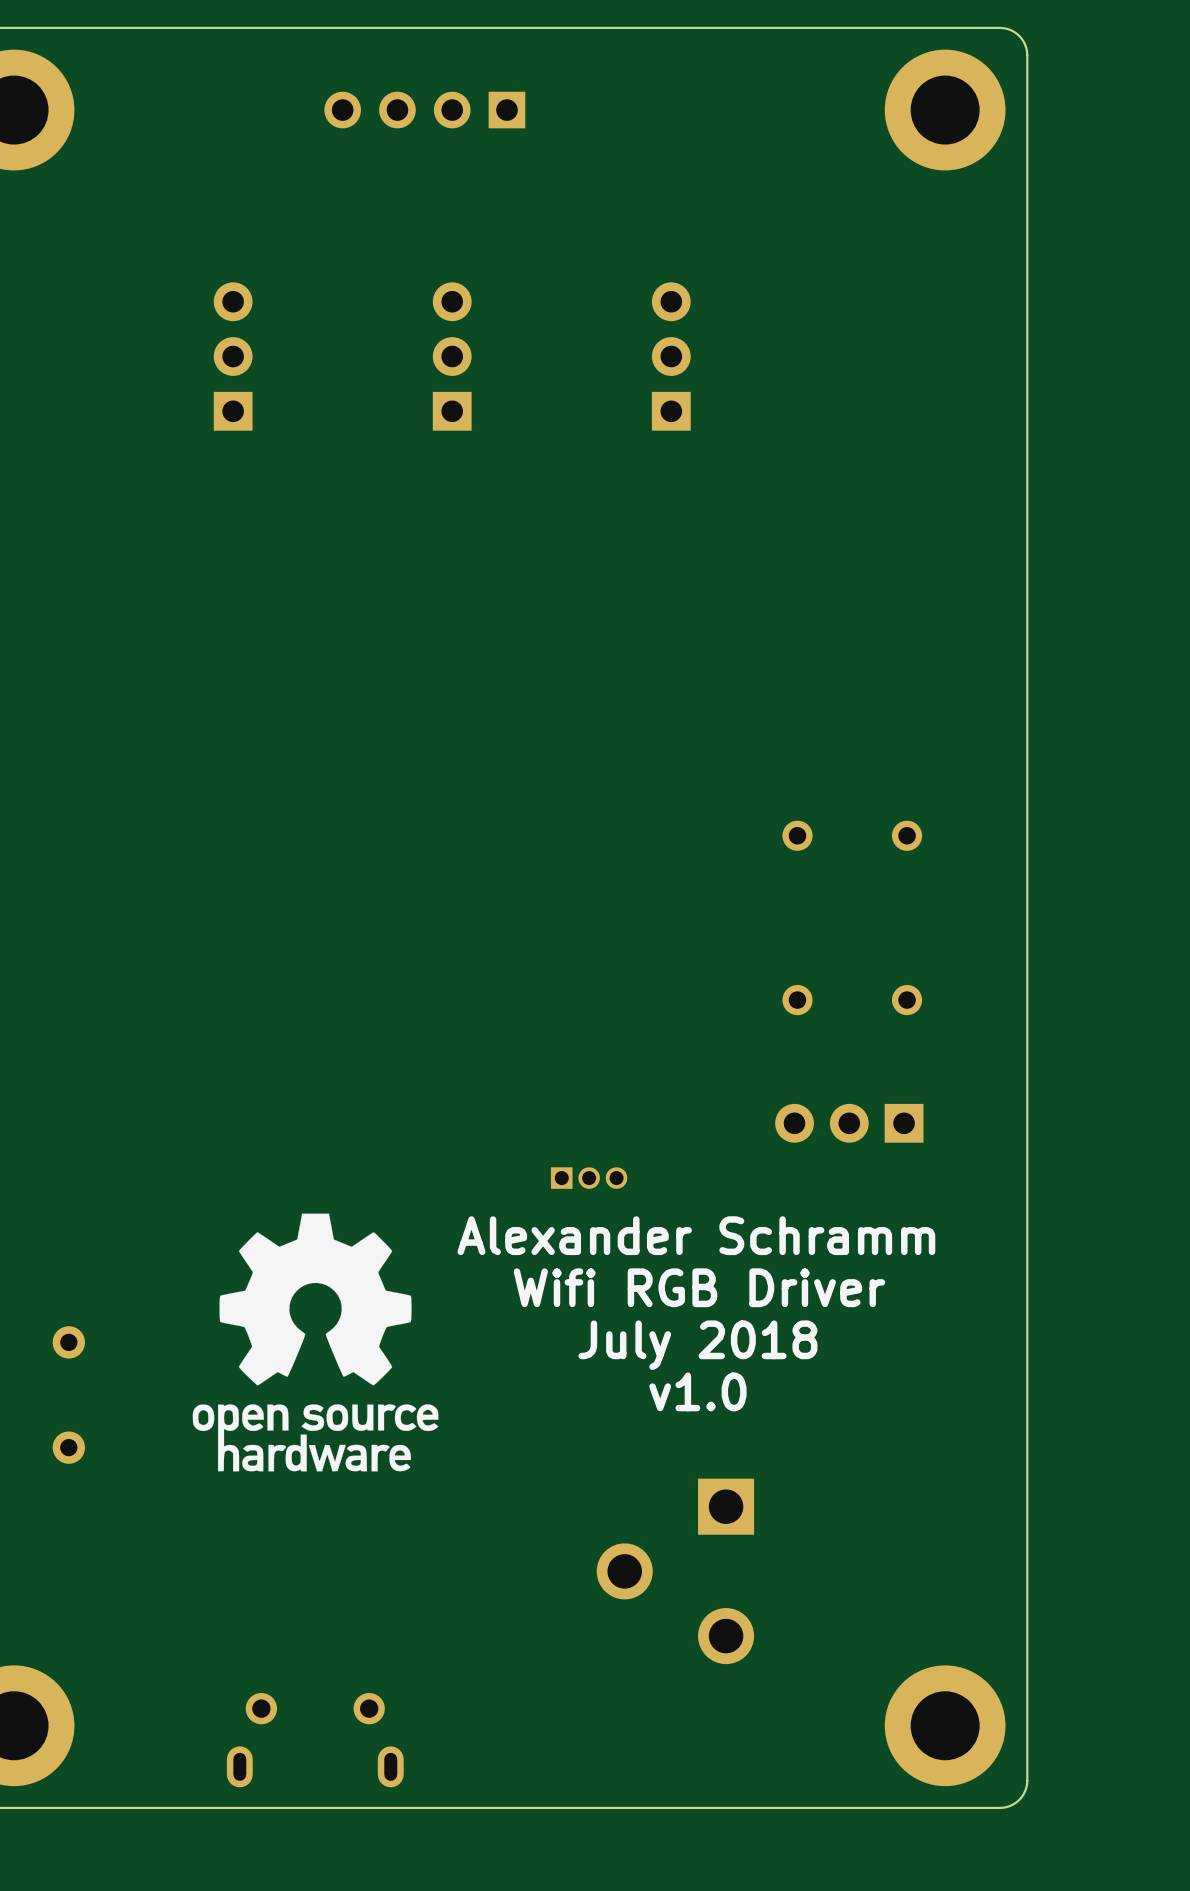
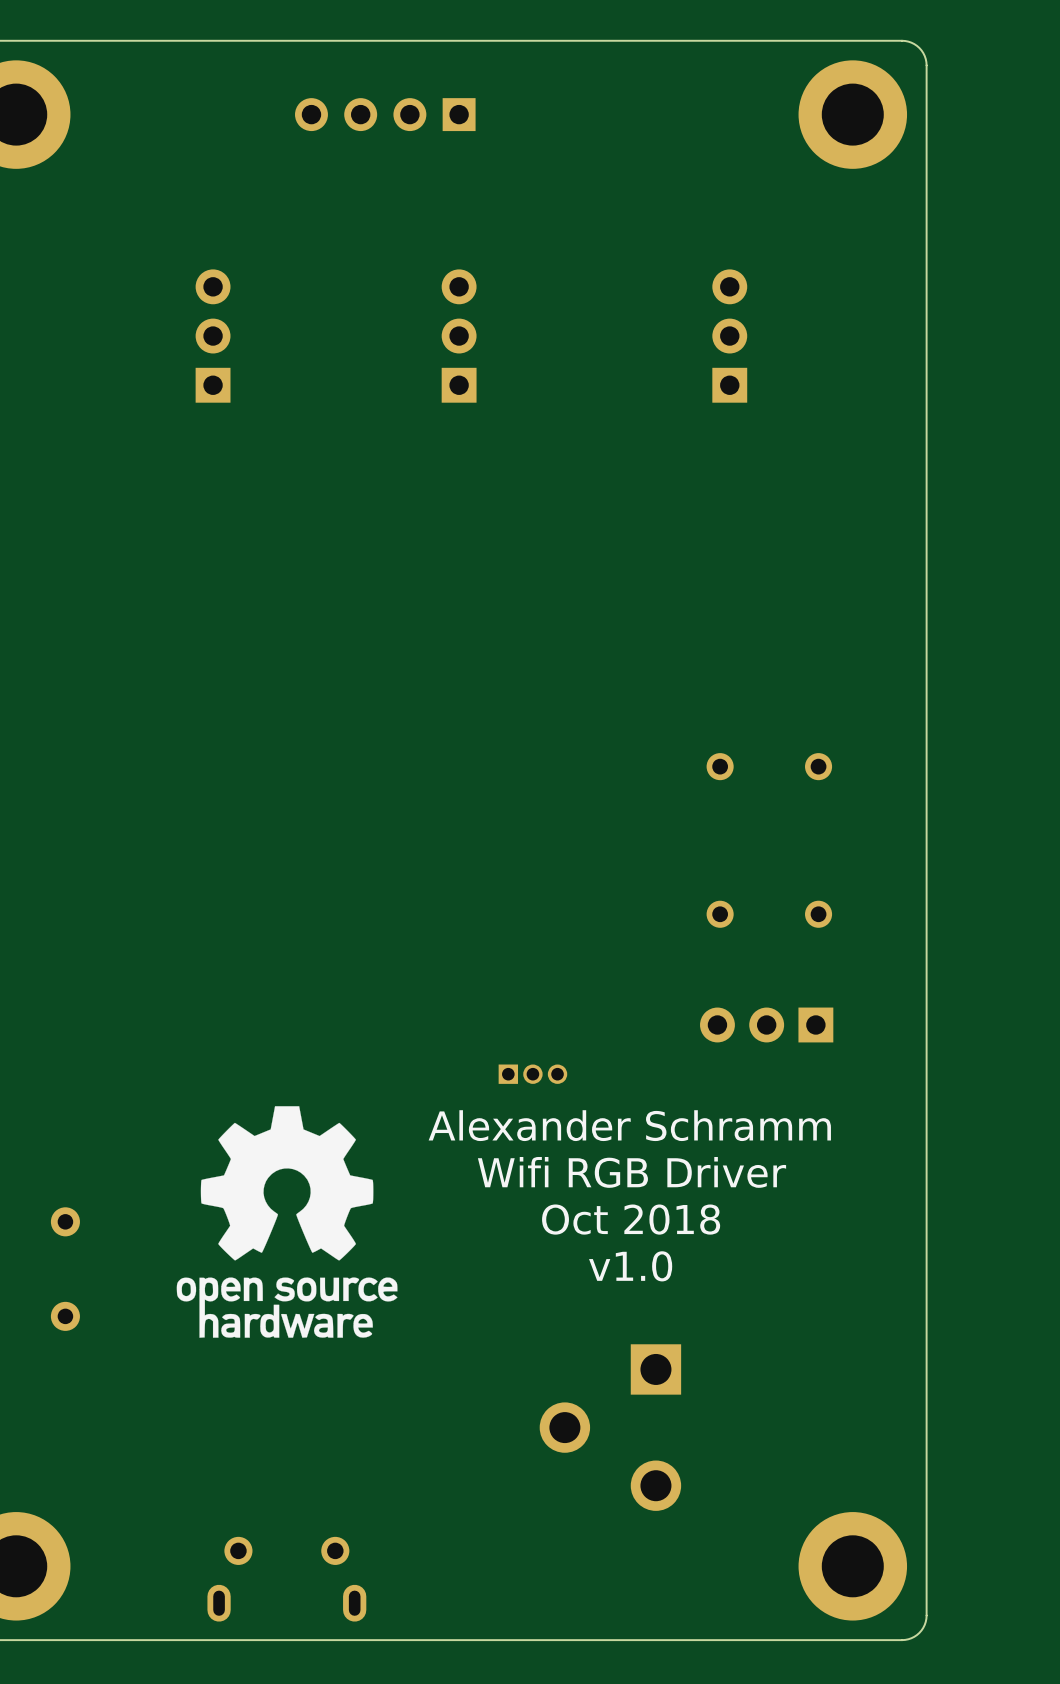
part position: (452, 356) -> (459, 336)
part: (671, 356) -> none
part: none -> (729, 336)
text: July 2018 (697, 1345) -> Oct 2018 (631, 1219)

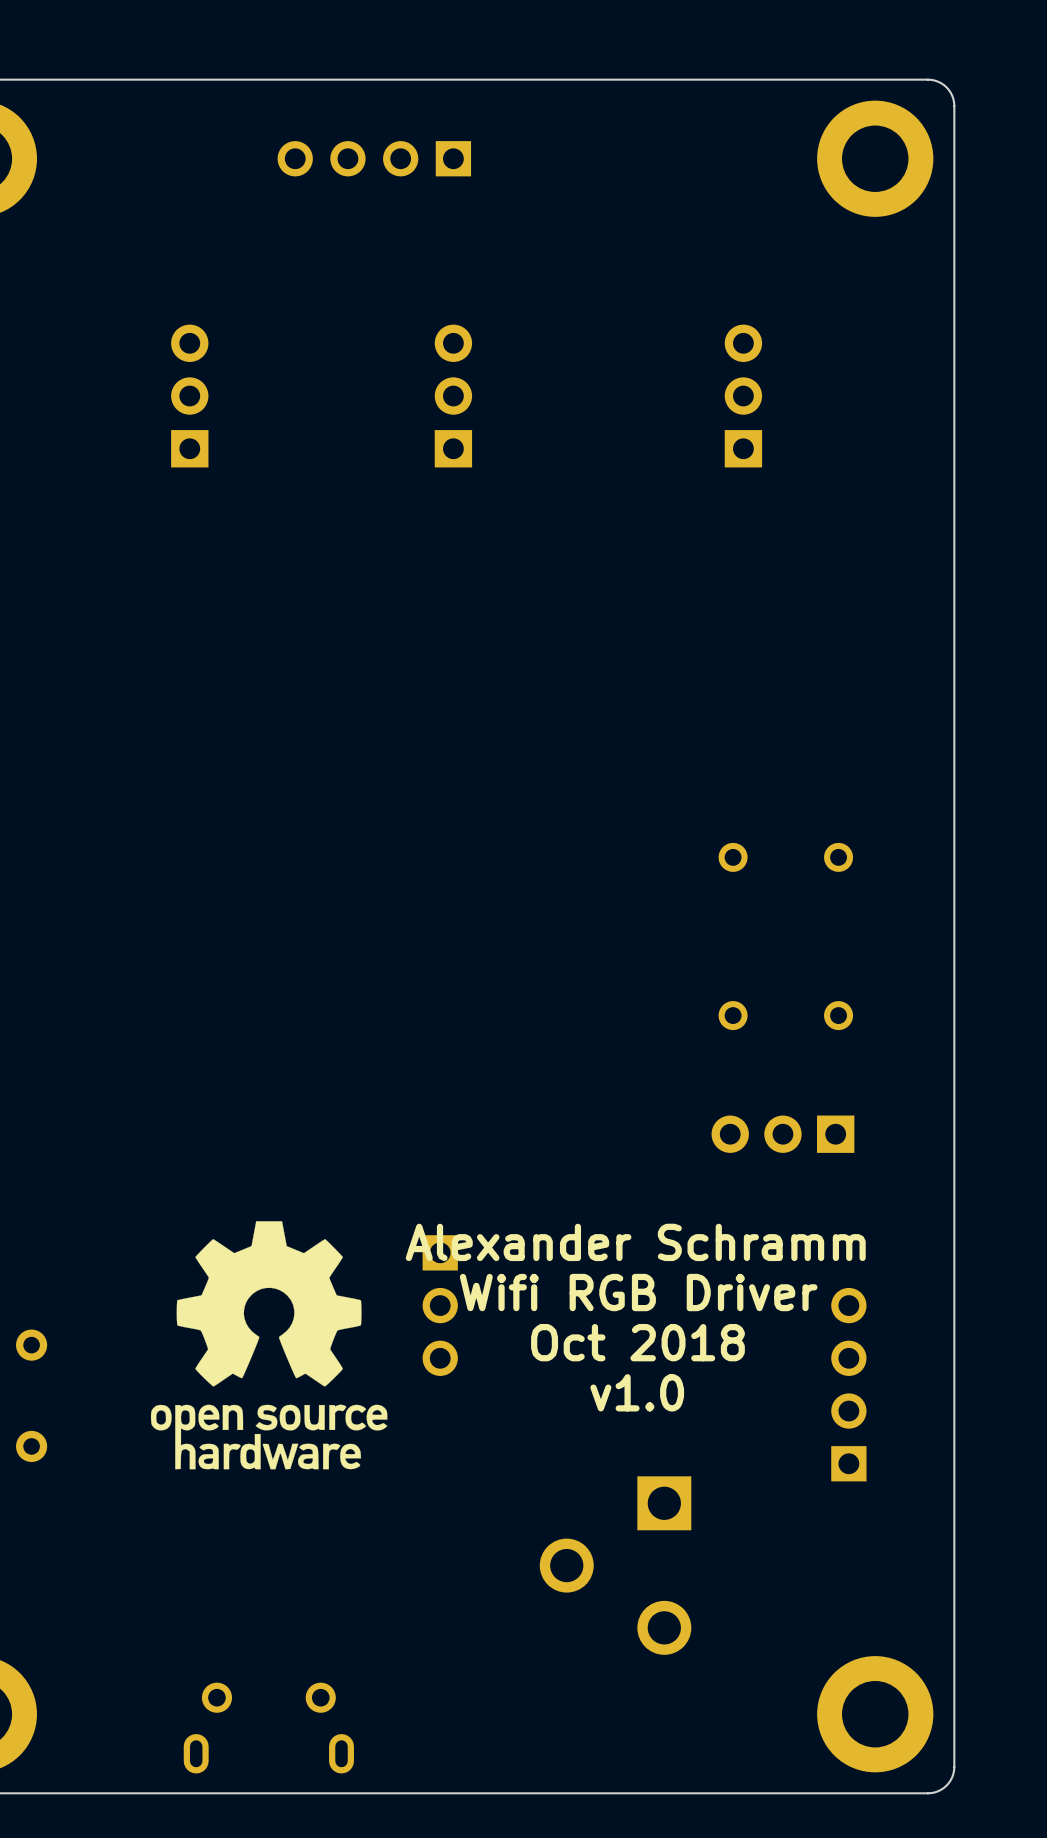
part: (532, 1074) -> none
part: none -> (440, 1305)
part: none -> (848, 1384)

